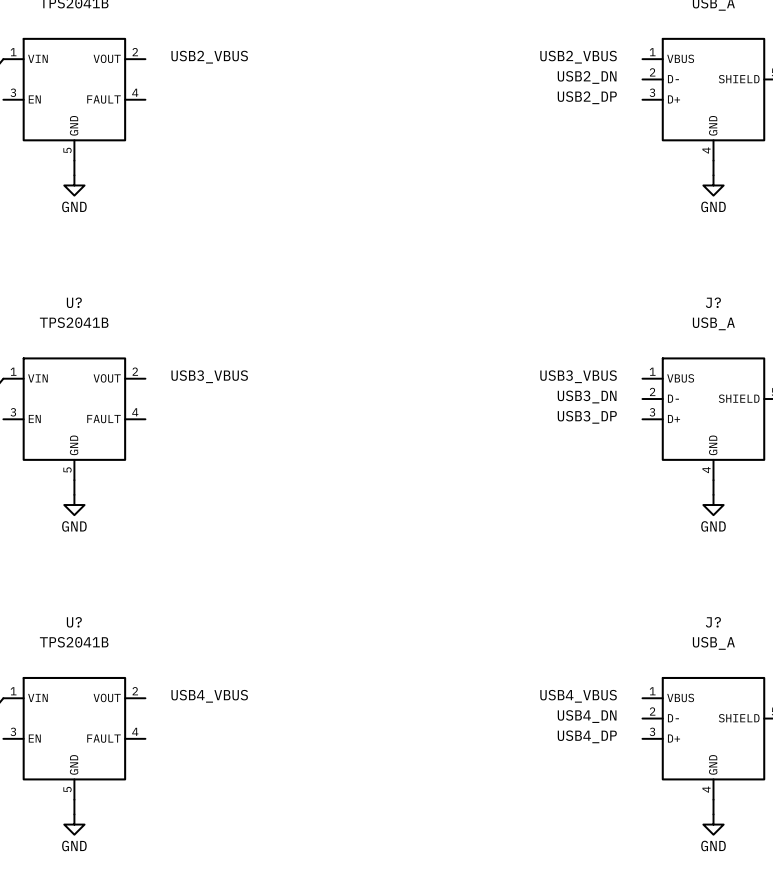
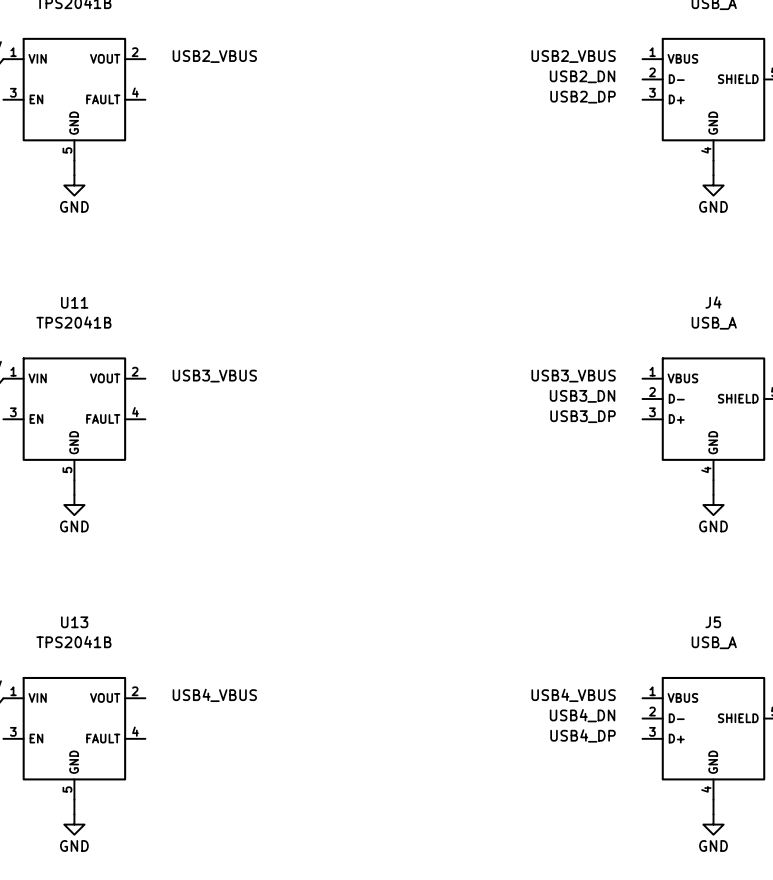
U? name: U? (74, 302) -> U11 (74, 302)
J? name: J? (713, 302) -> J4 (713, 302)
U? name: U? (74, 622) -> U13 (74, 622)
J? name: J? (713, 622) -> J5 (713, 622)

